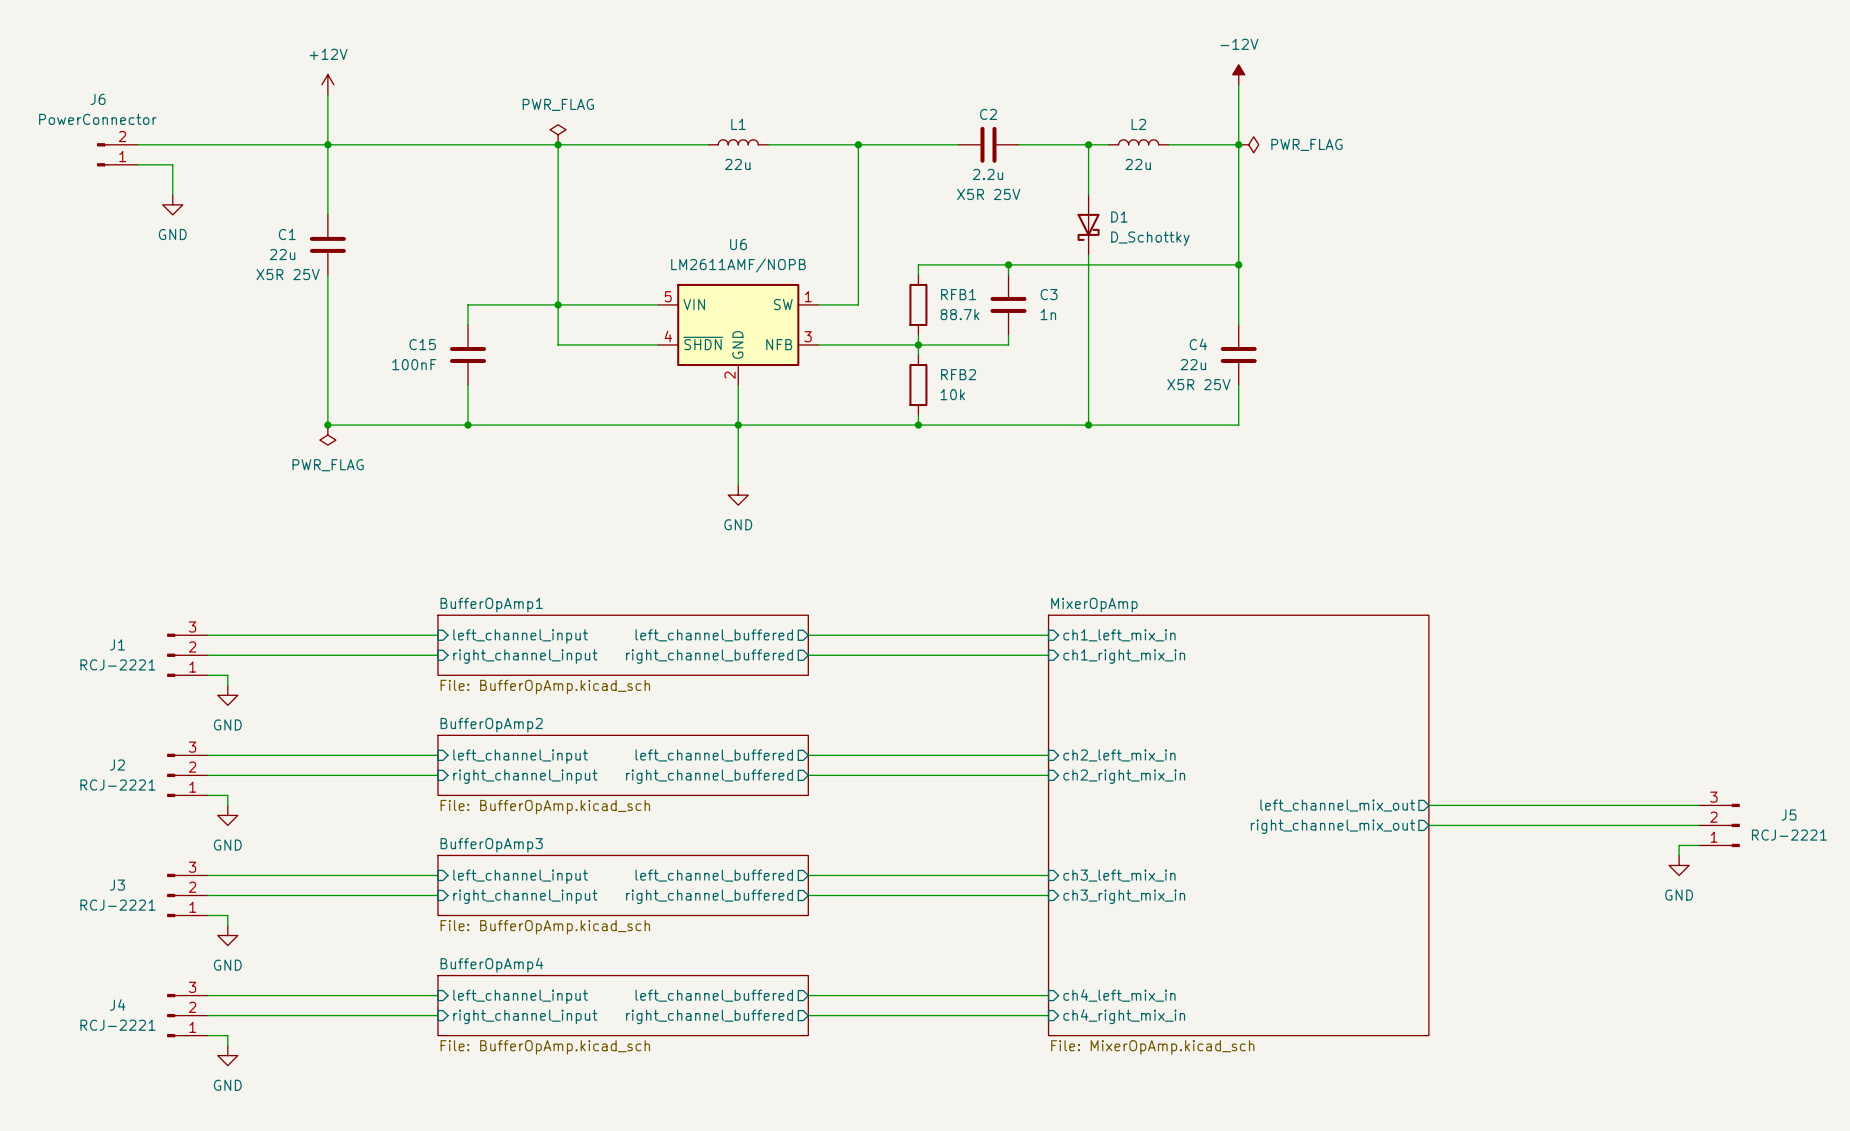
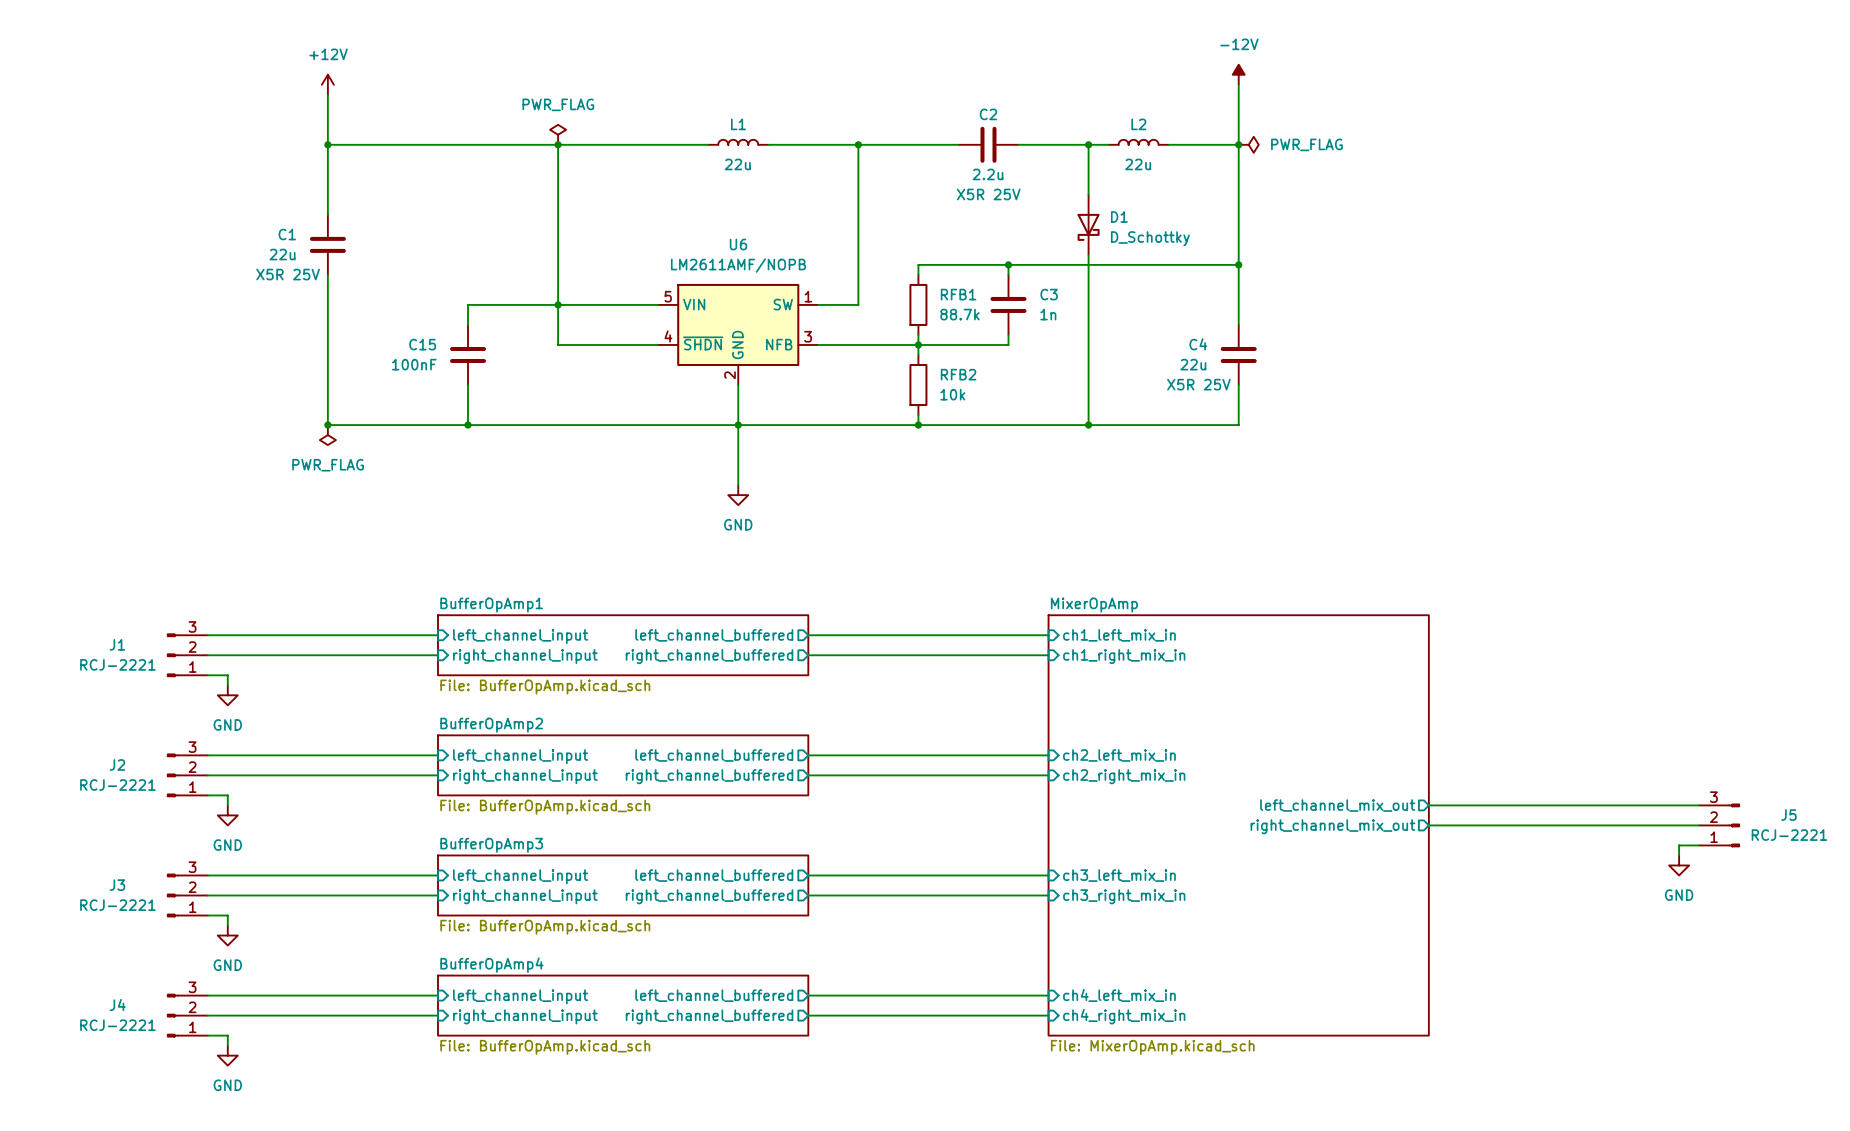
wire: (137, 144) (327, 144) -> none
J6: PowerConnector (117, 154) -> none
wire: (137, 164) (172, 164) (172, 194) -> none
power symbol: GND (172, 204) -> none

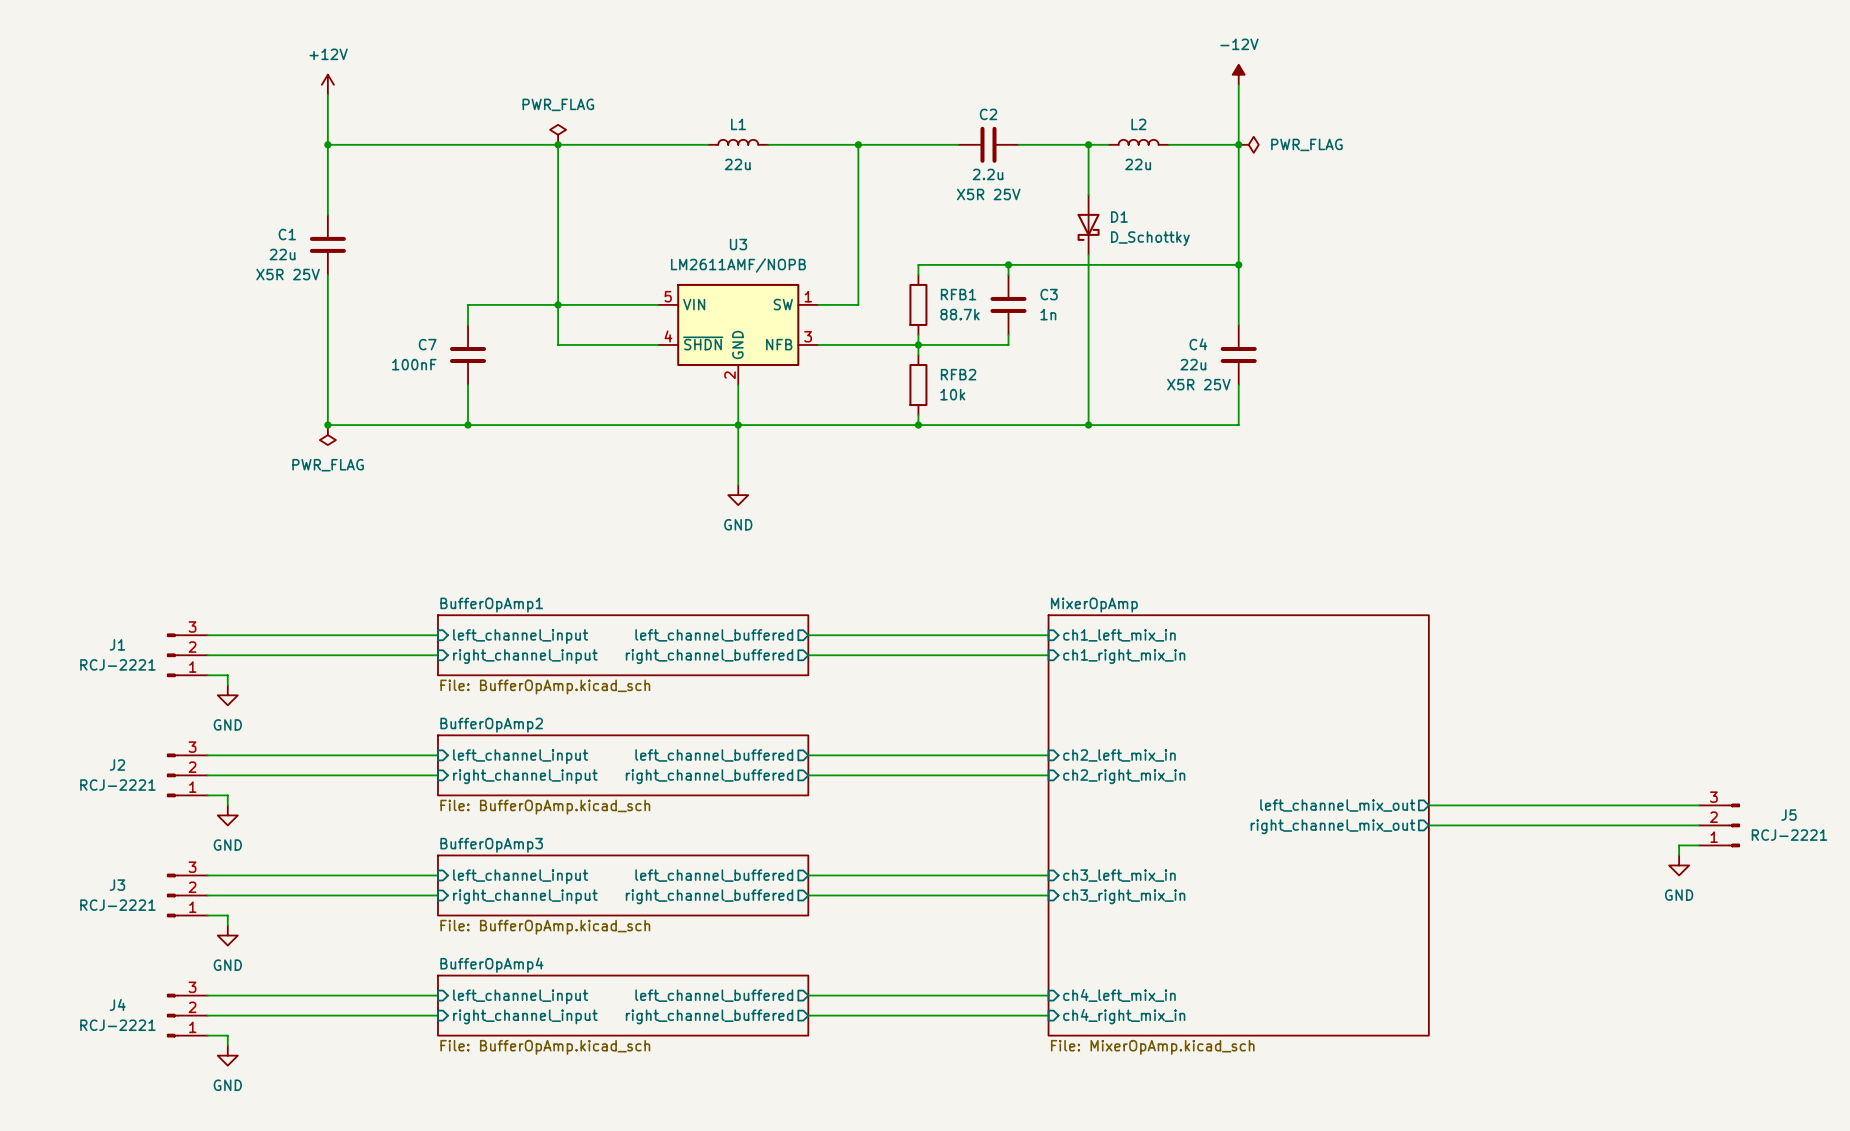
U6 name: U6 (738, 244) -> U3 (738, 244)
C15 name: C15 (422, 344) -> C7 (427, 344)

